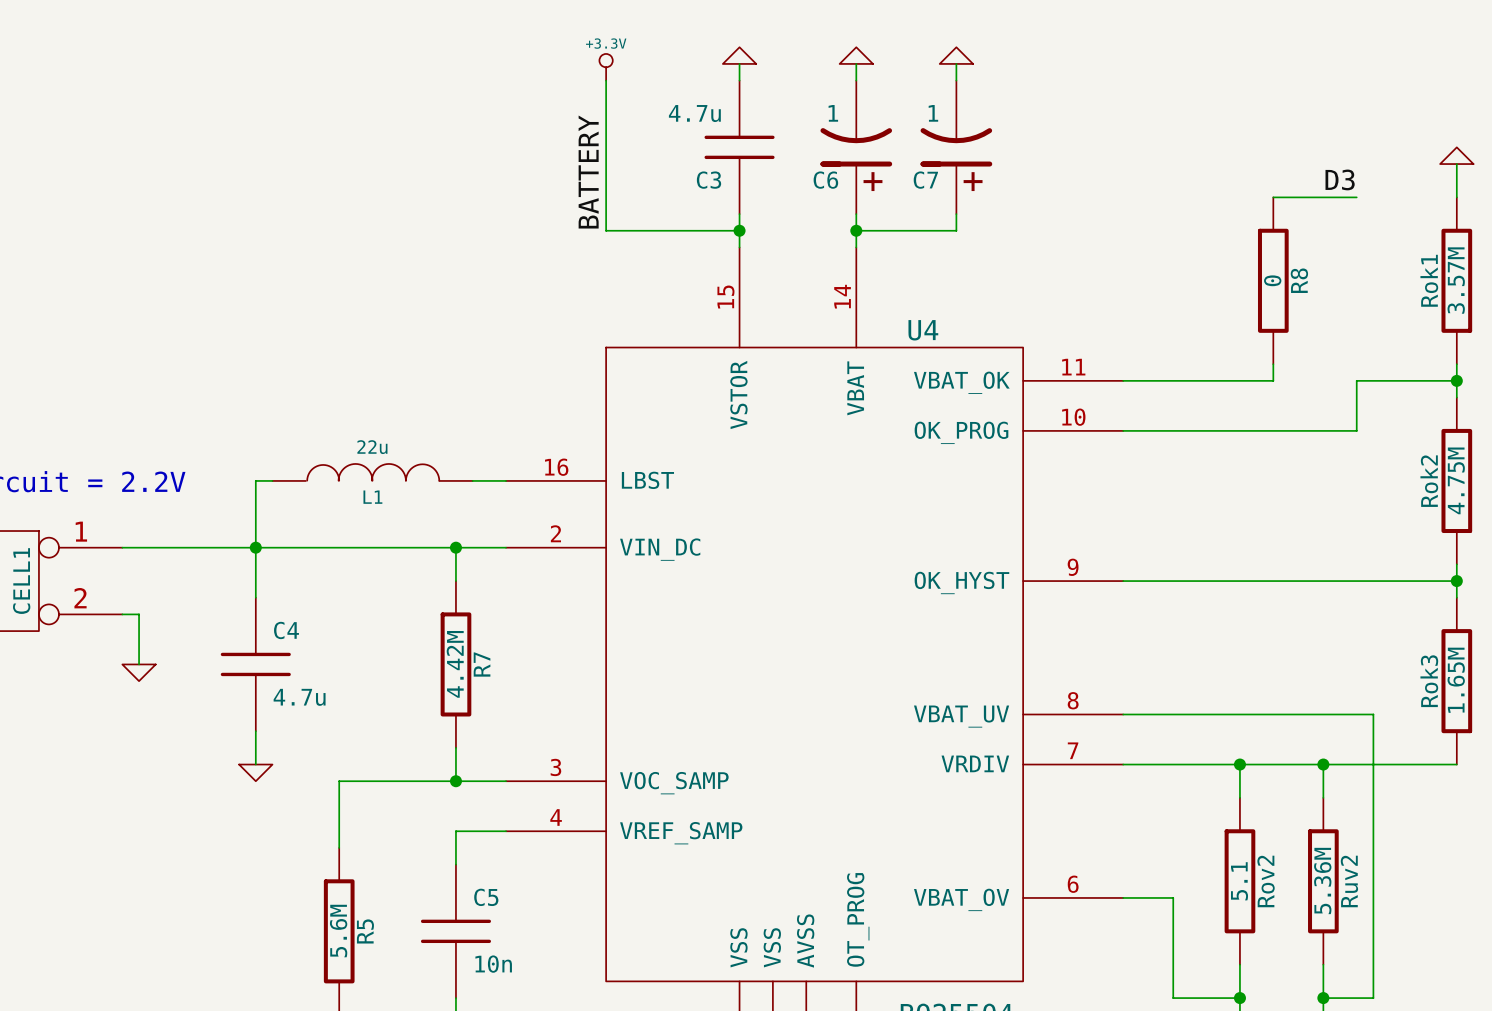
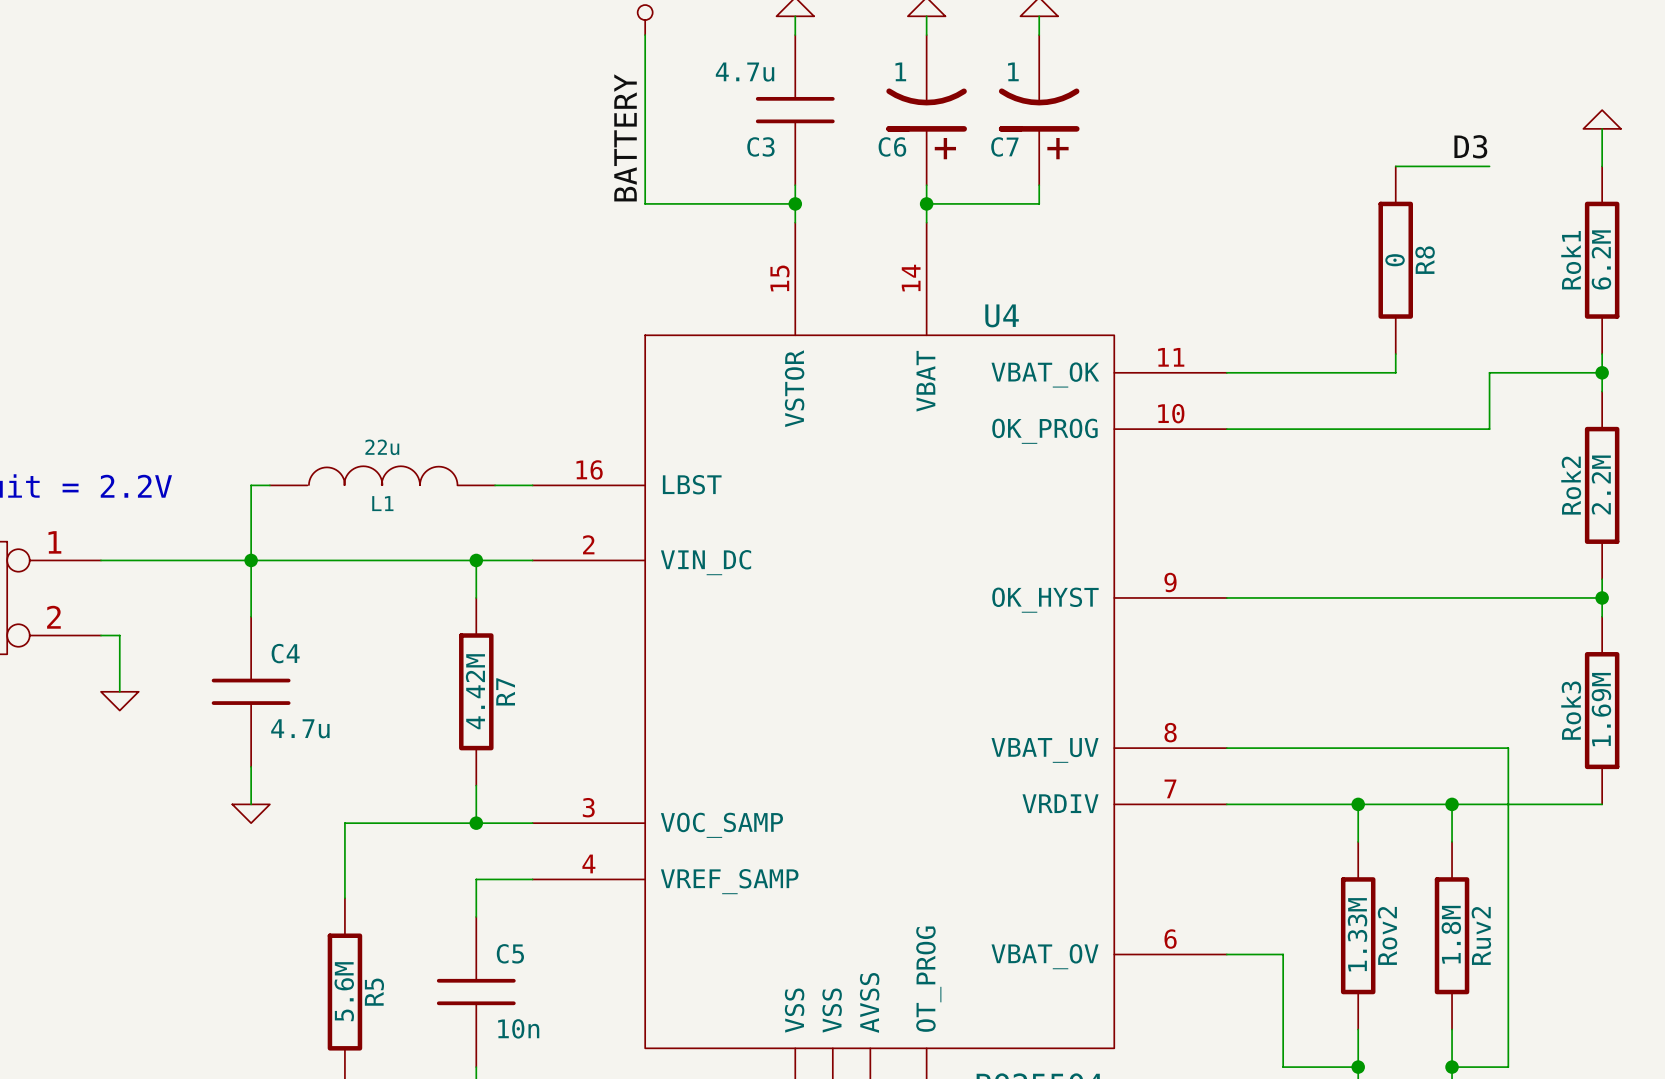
Rok1 value: 3.57M (1456, 280) -> 6.2M (1601, 259)
Rok2 value: 4.75M (1456, 480) -> 2.2M (1601, 484)
Rok3 value: 1.65M (1456, 680) -> 1.69M (1601, 709)
Ruv2 value: 5.36M (1322, 880) -> 1.8M (1451, 934)
Rov2 value: 5.1 (1239, 881) -> 1.33M (1357, 934)

